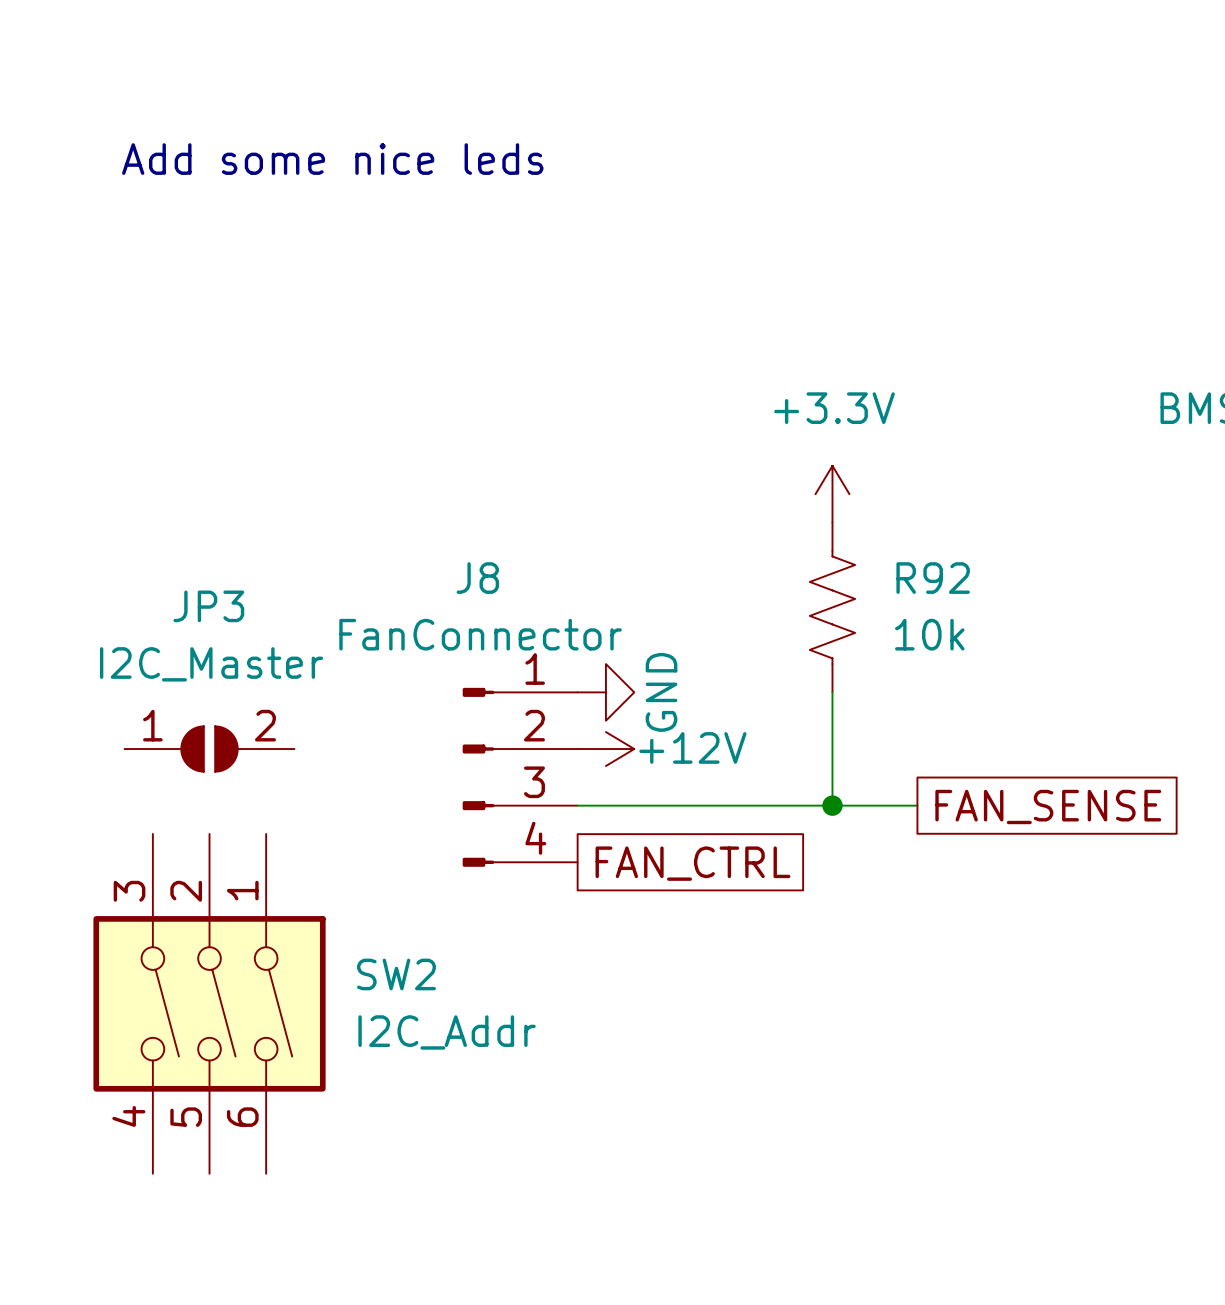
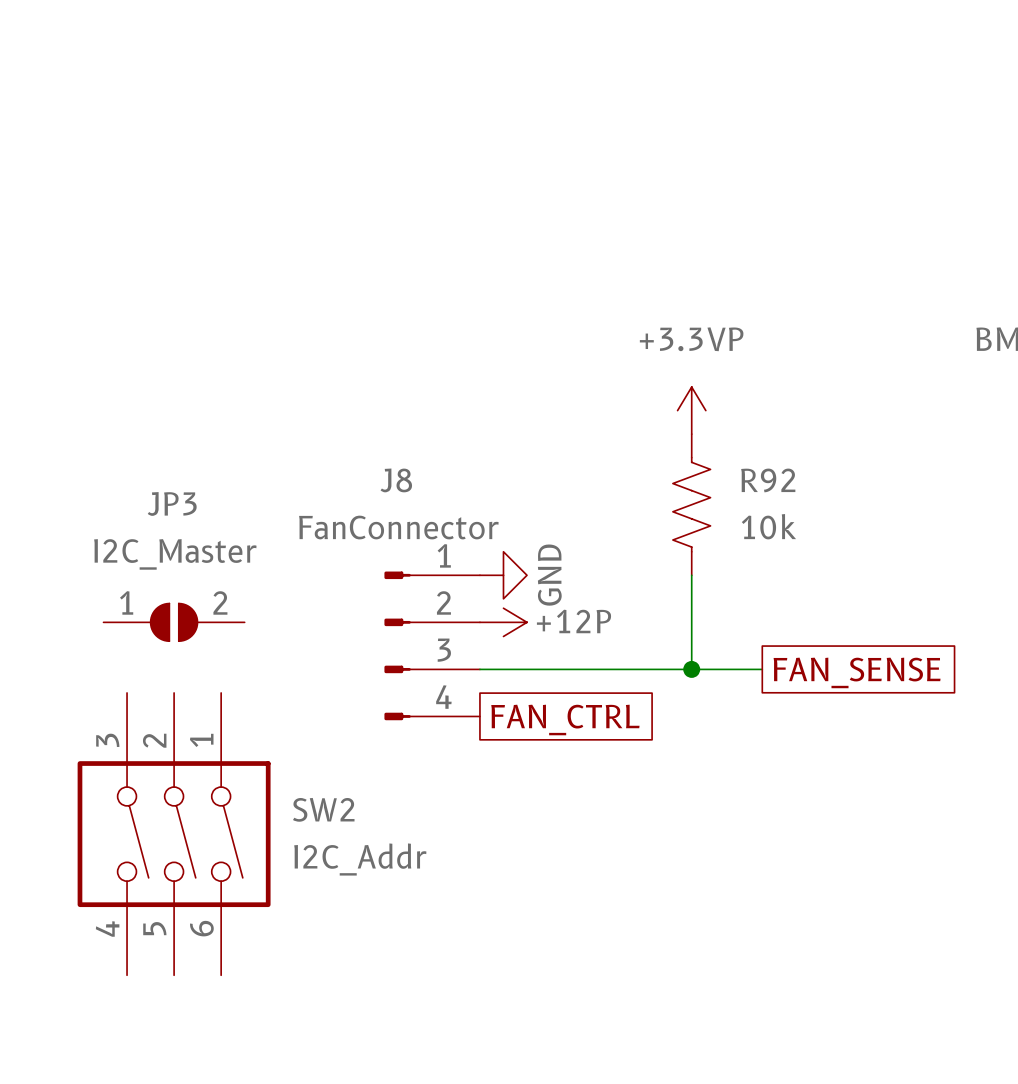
text: Add some nice leds (332, 159) -> none
power symbol: +3.3V (832, 494) -> +3.3VP (691, 410)
power symbol: +12V (605, 749) -> +12P (503, 622)

